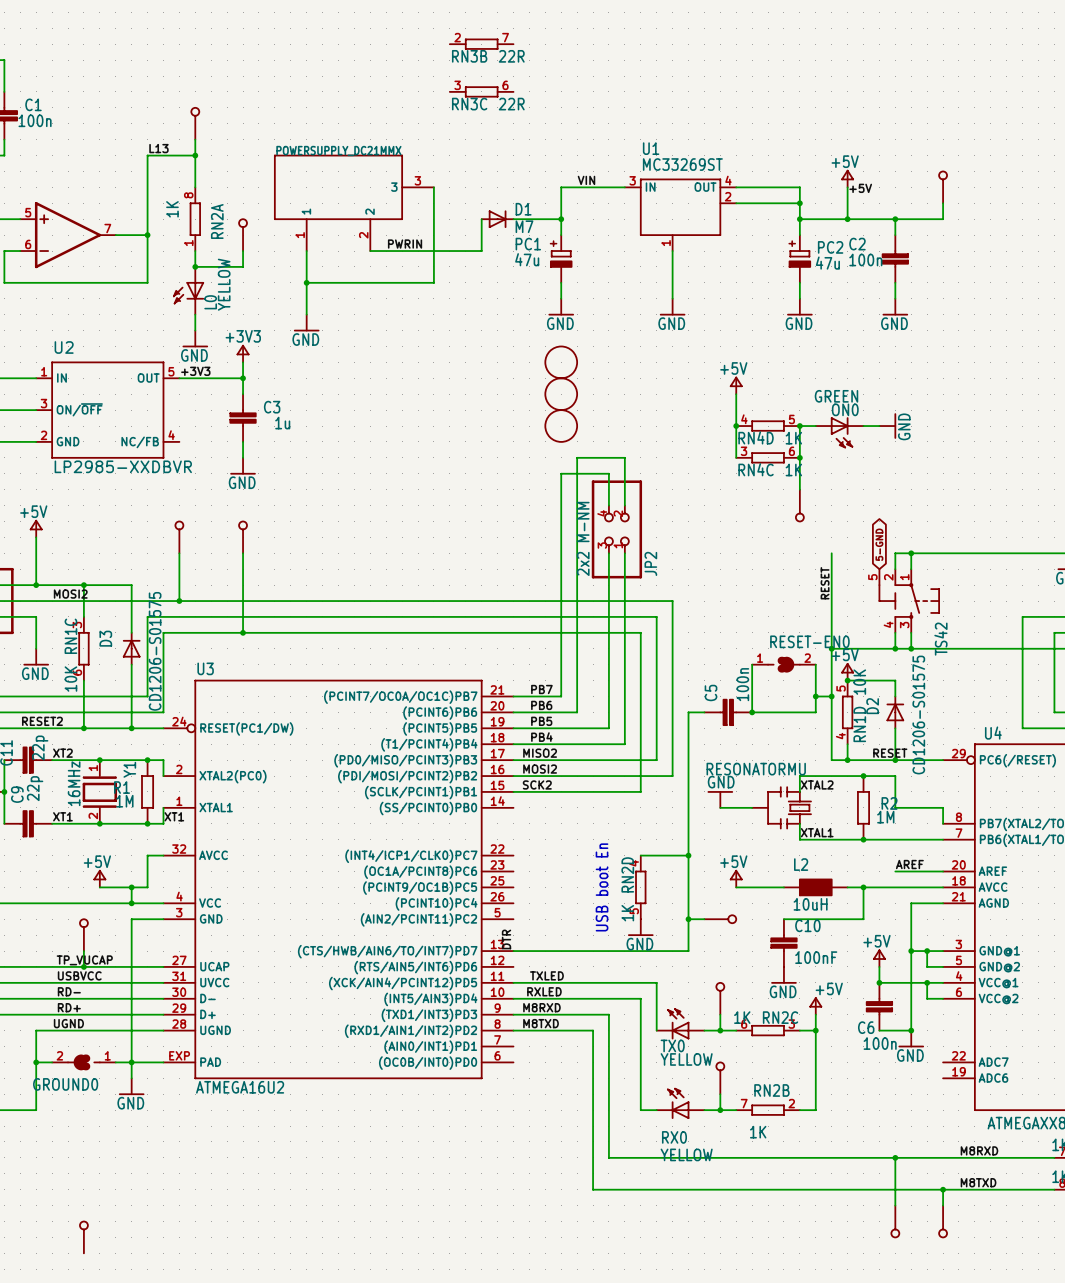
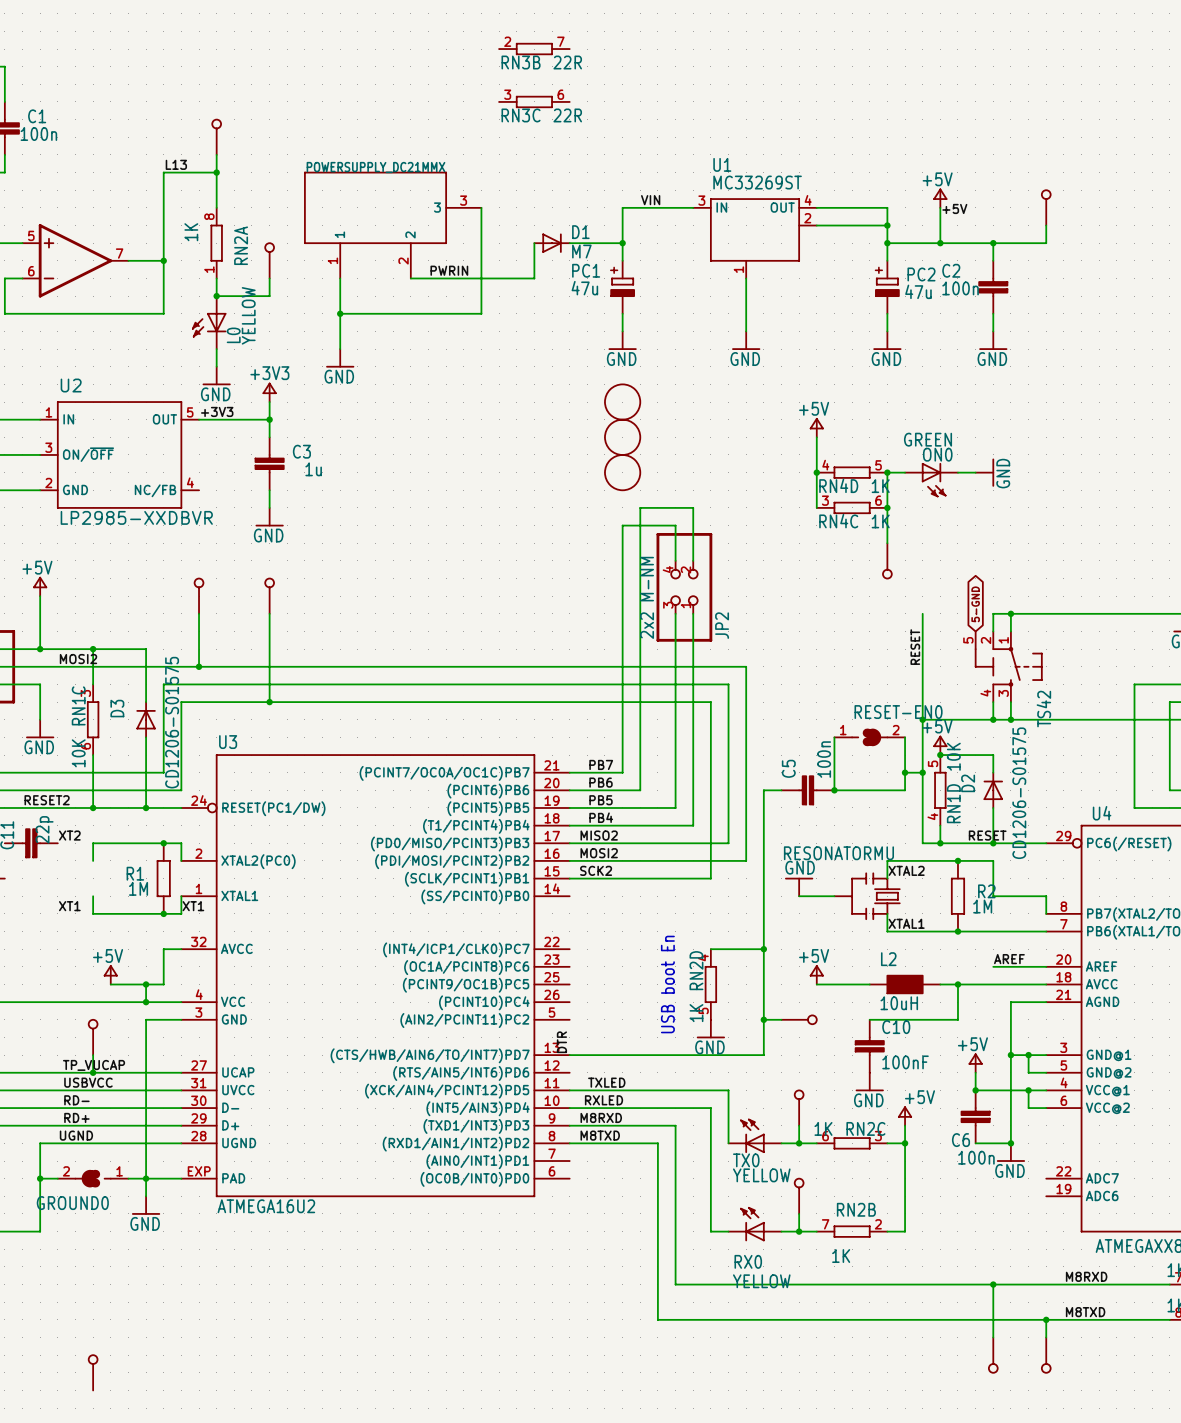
wire: (4, 760) (4, 823) -> none
wire: (52, 760) (83, 760) -> (93, 860) (93, 843)
junction: (99, 760) -> none
junction: (4, 791) -> none
Y1: 16MHz (99, 791) -> none
C9: 22p (28, 823) -> none
wire: (52, 823) (83, 823) -> (93, 896) (93, 913)
junction: (99, 823) -> none

